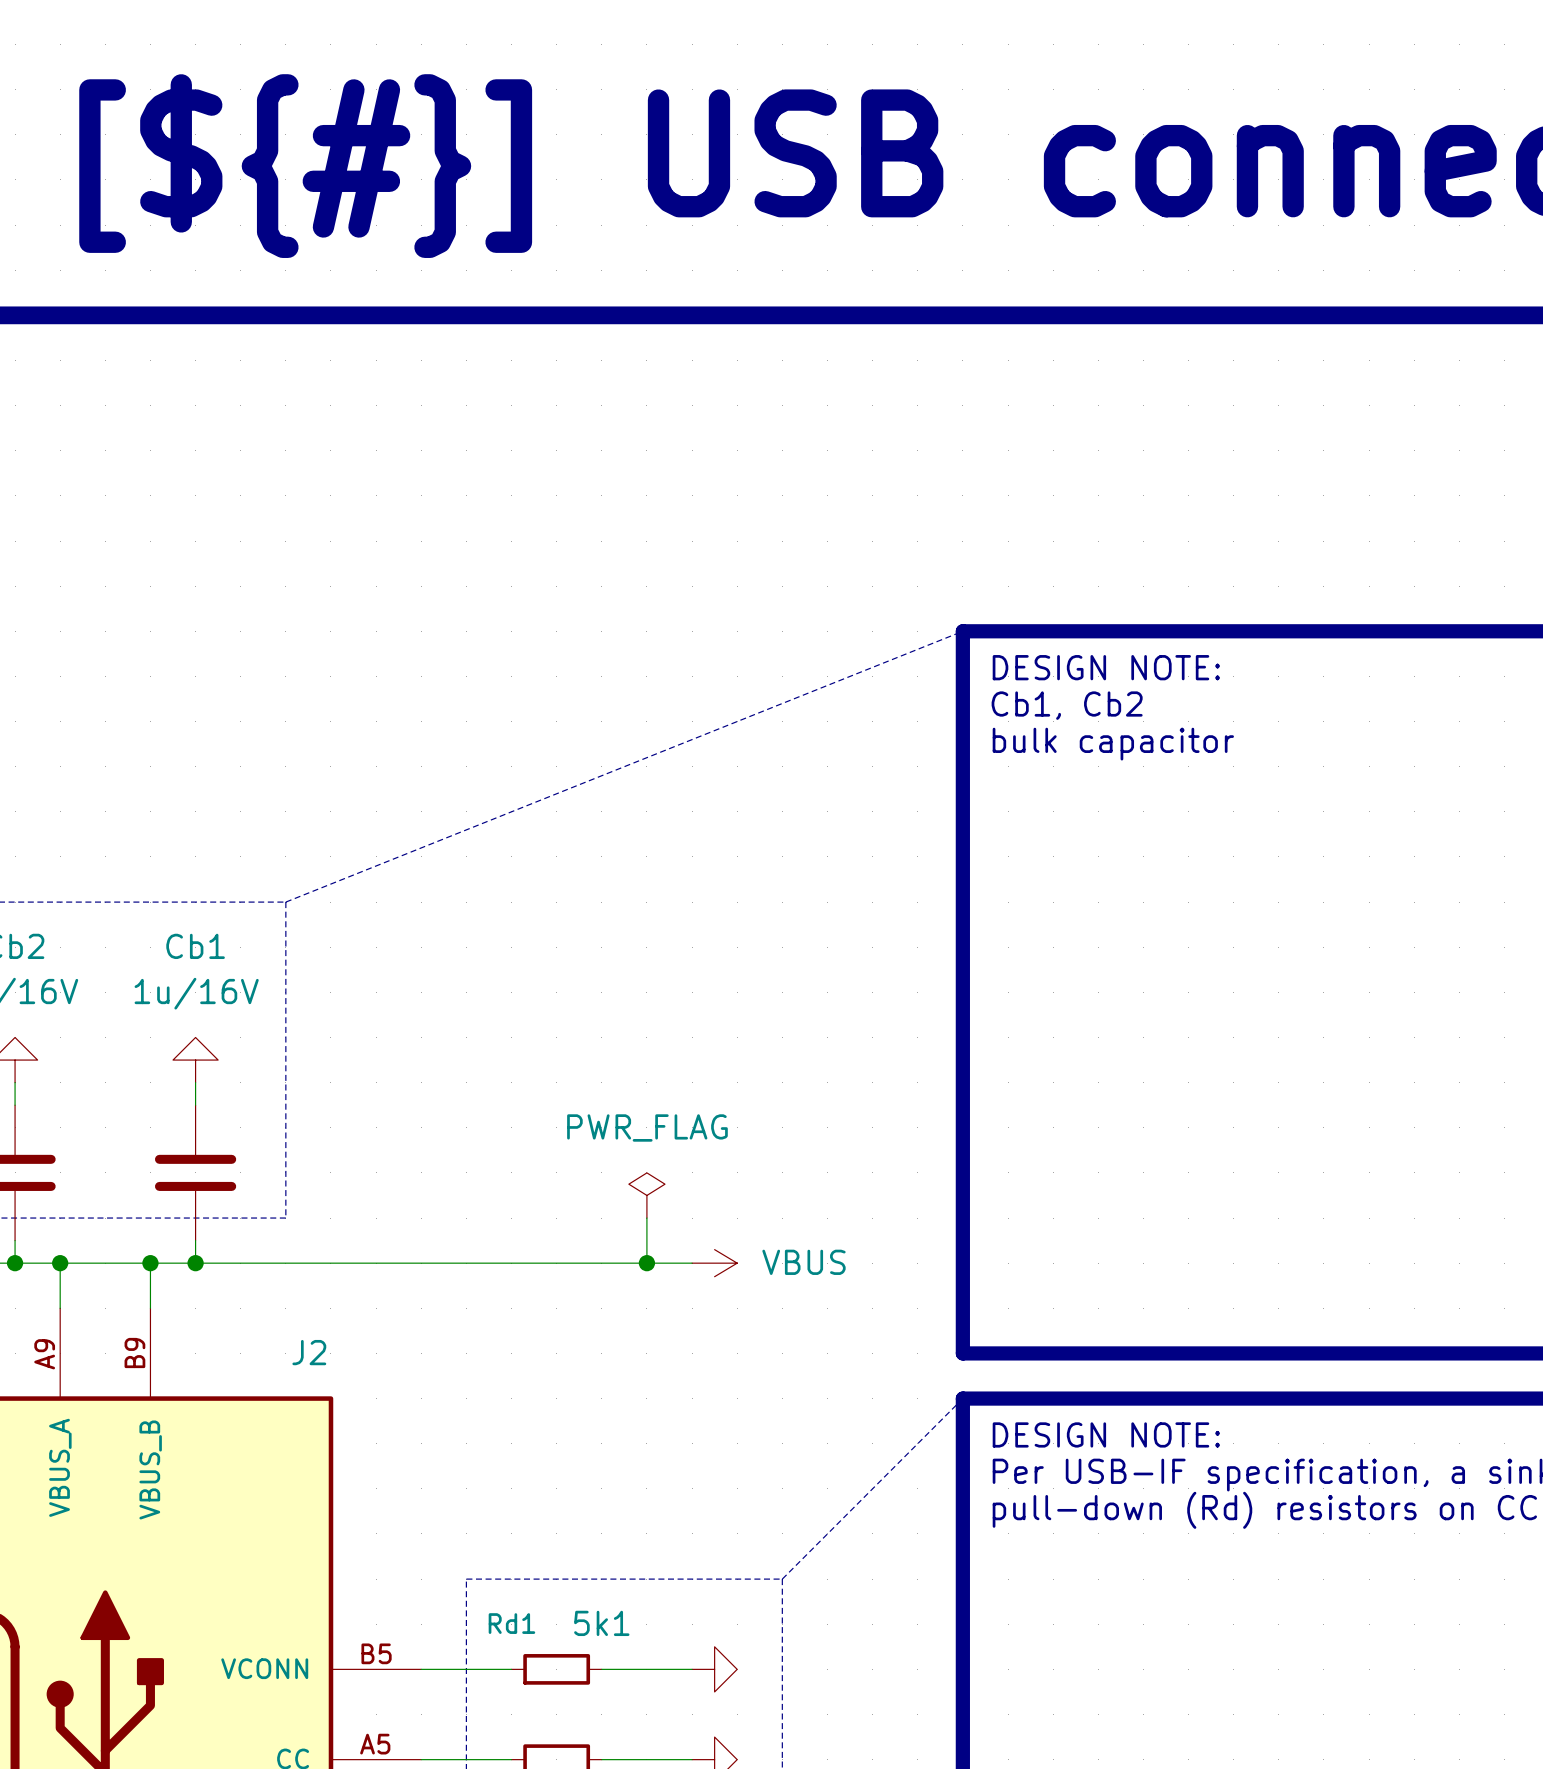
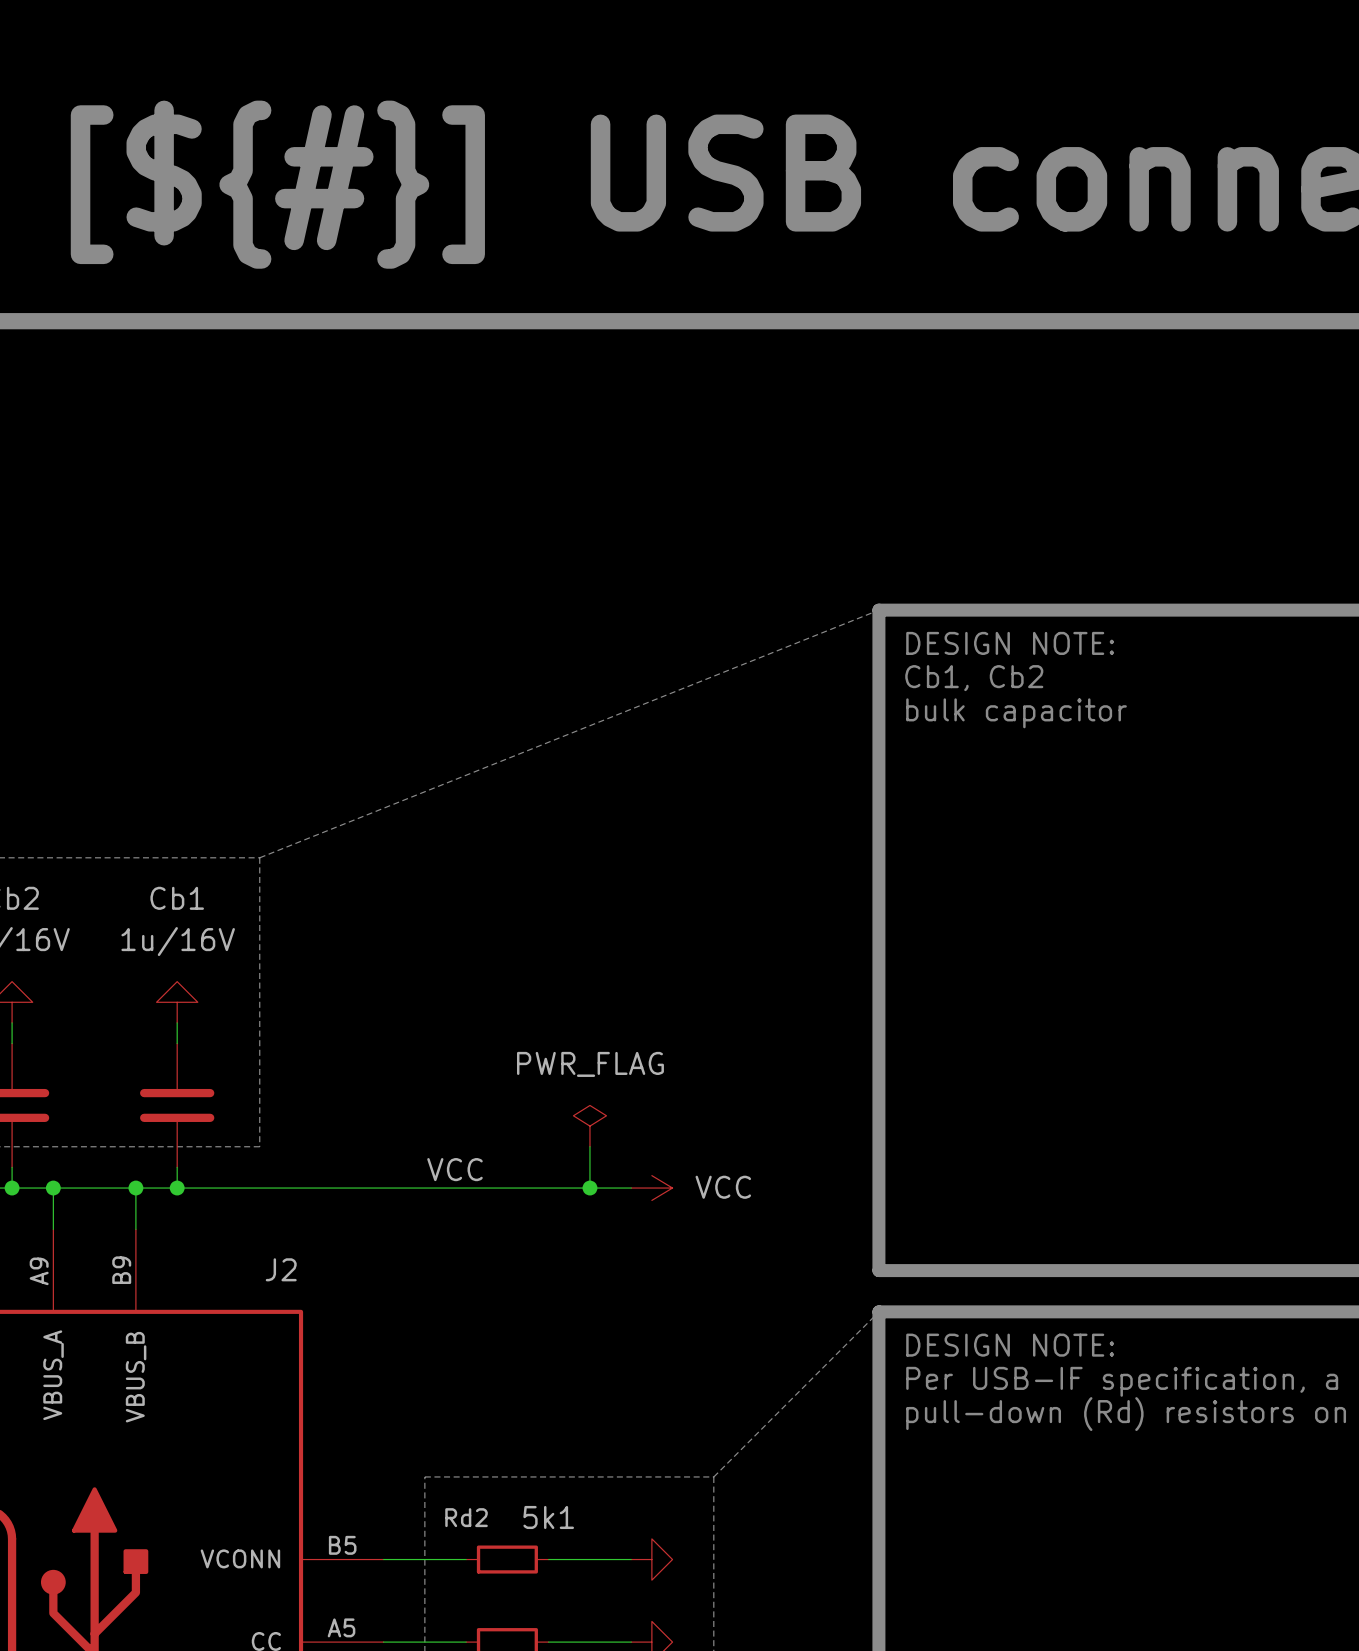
label: none -> VCC (454, 1169)
power symbol: VBUS (714, 1263) -> VCC (651, 1188)
Rd1 name: Rd1 (511, 1623) -> Rd2 (466, 1517)

